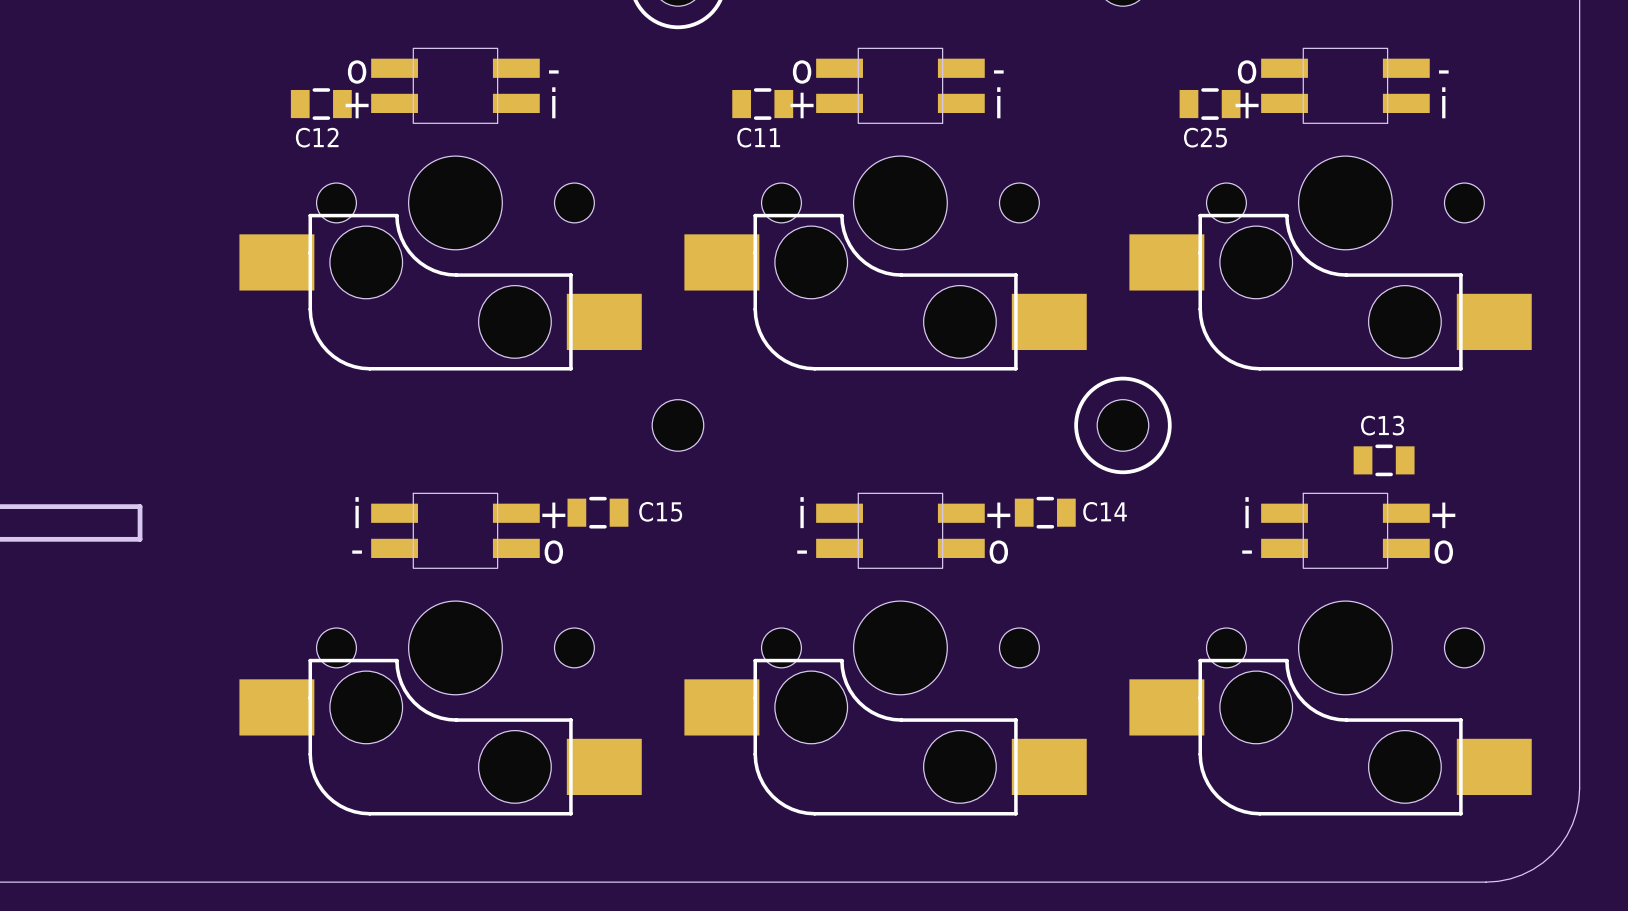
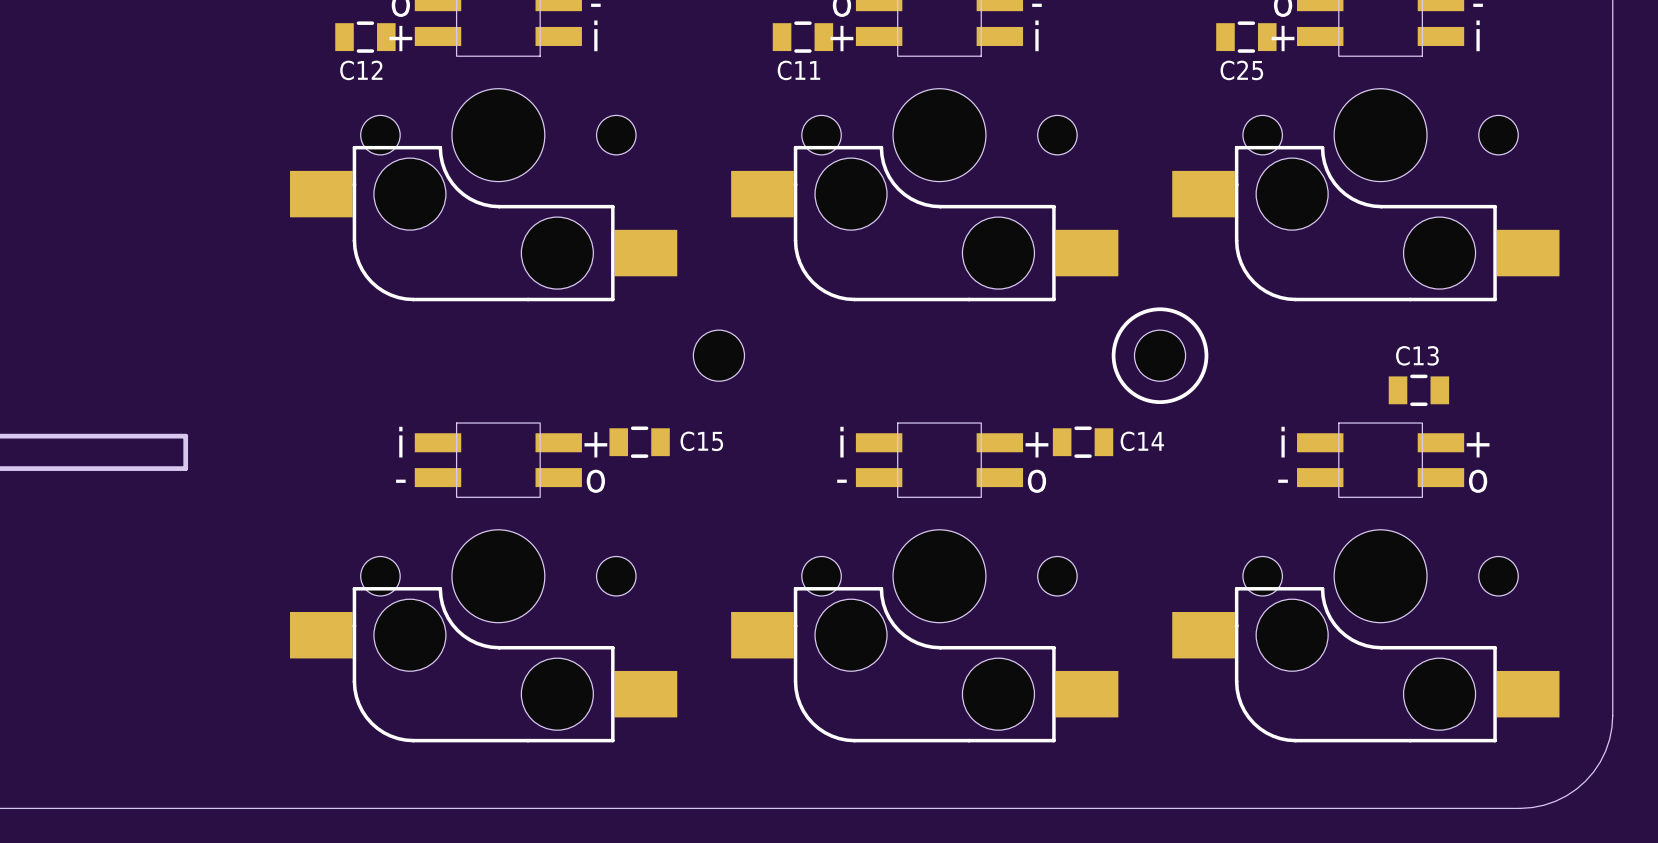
part footprint: [239, 156, 642, 371] -> [290, 88, 678, 302]
part footprint: [684, 156, 1087, 371] -> [731, 88, 1119, 302]
part footprint: [1129, 156, 1532, 371] -> [1172, 88, 1560, 302]
part footprint: [239, 601, 642, 816] -> [290, 529, 678, 743]
part footprint: [684, 601, 1087, 816] -> [731, 529, 1119, 743]
part footprint: [1129, 601, 1532, 816] -> [1172, 529, 1560, 743]

